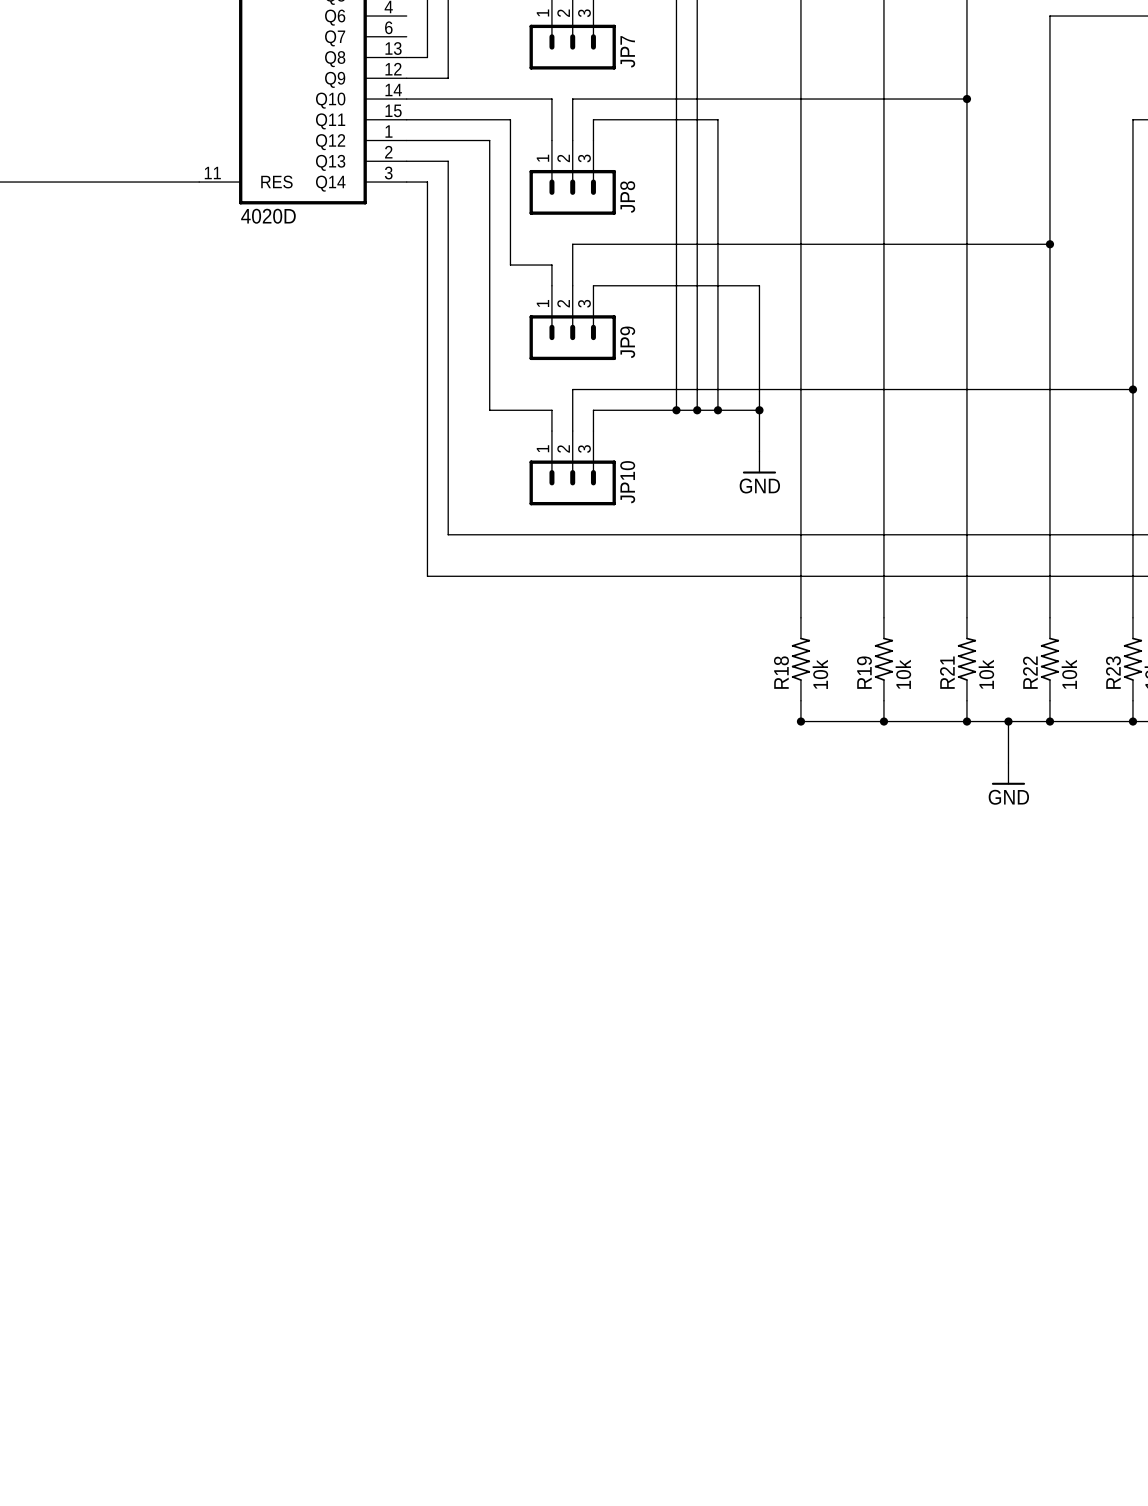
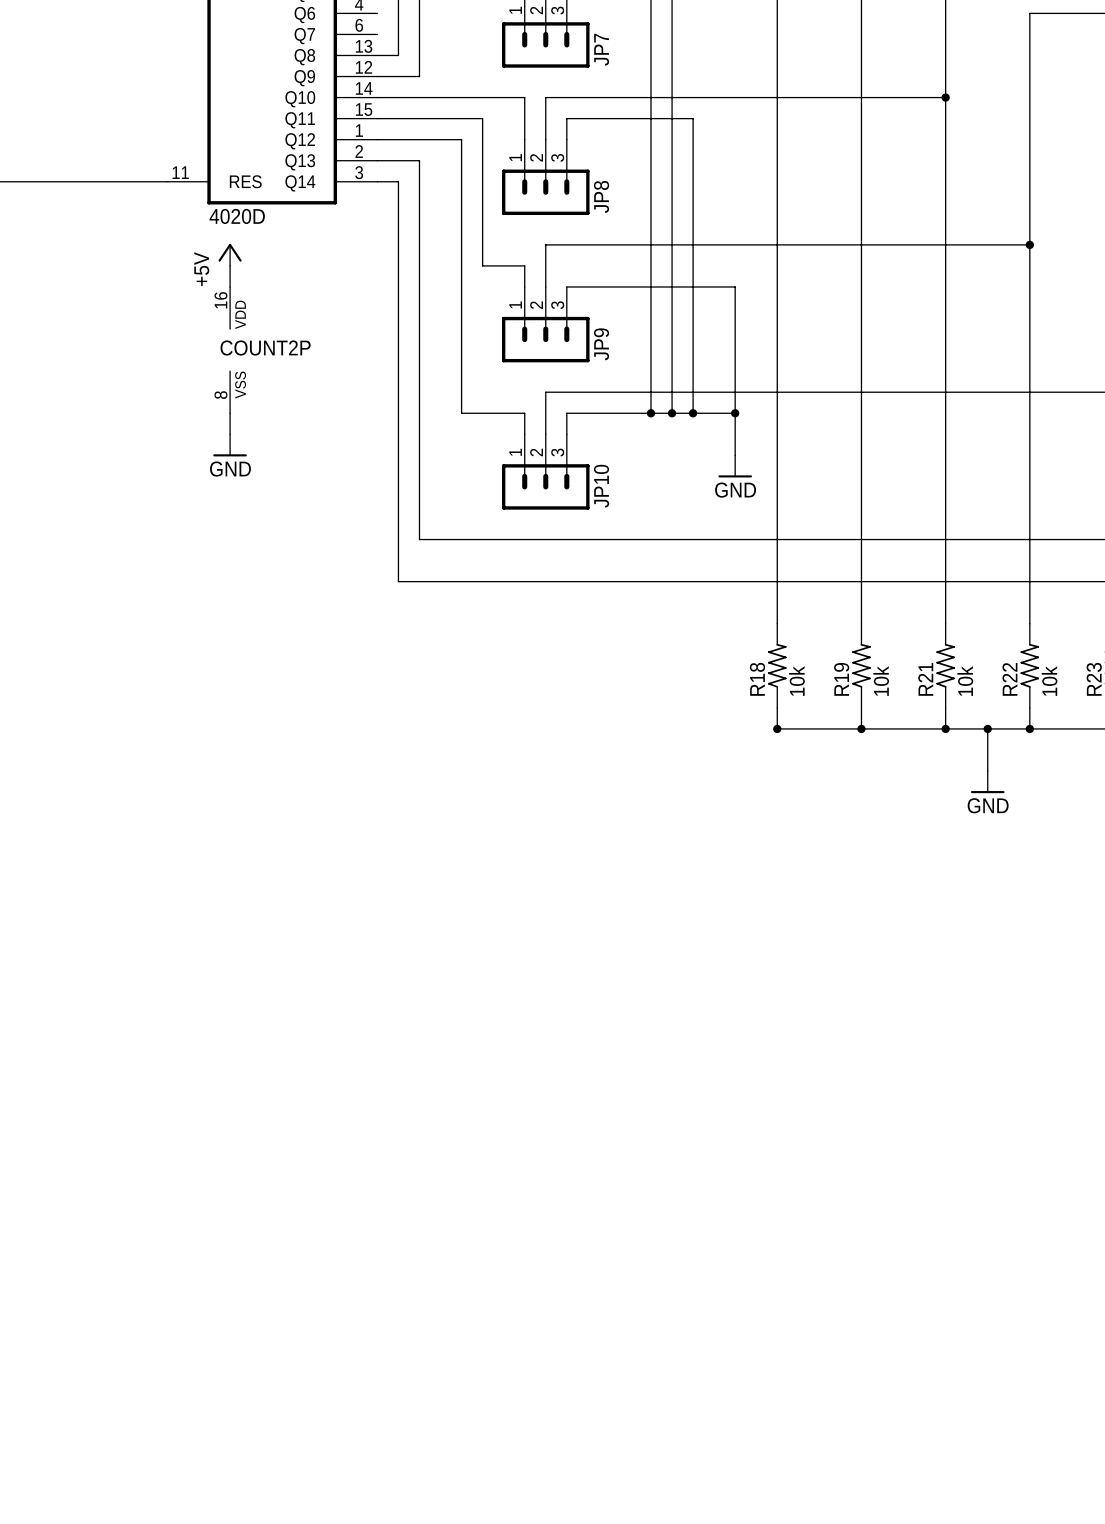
power symbol: none -> +5V (230, 254)
wire: none -> (230, 265) (230, 286)
COUNT2P: none -> (230, 350)
wire: none -> (230, 413) (230, 434)
power symbol: none -> GND (230, 445)

